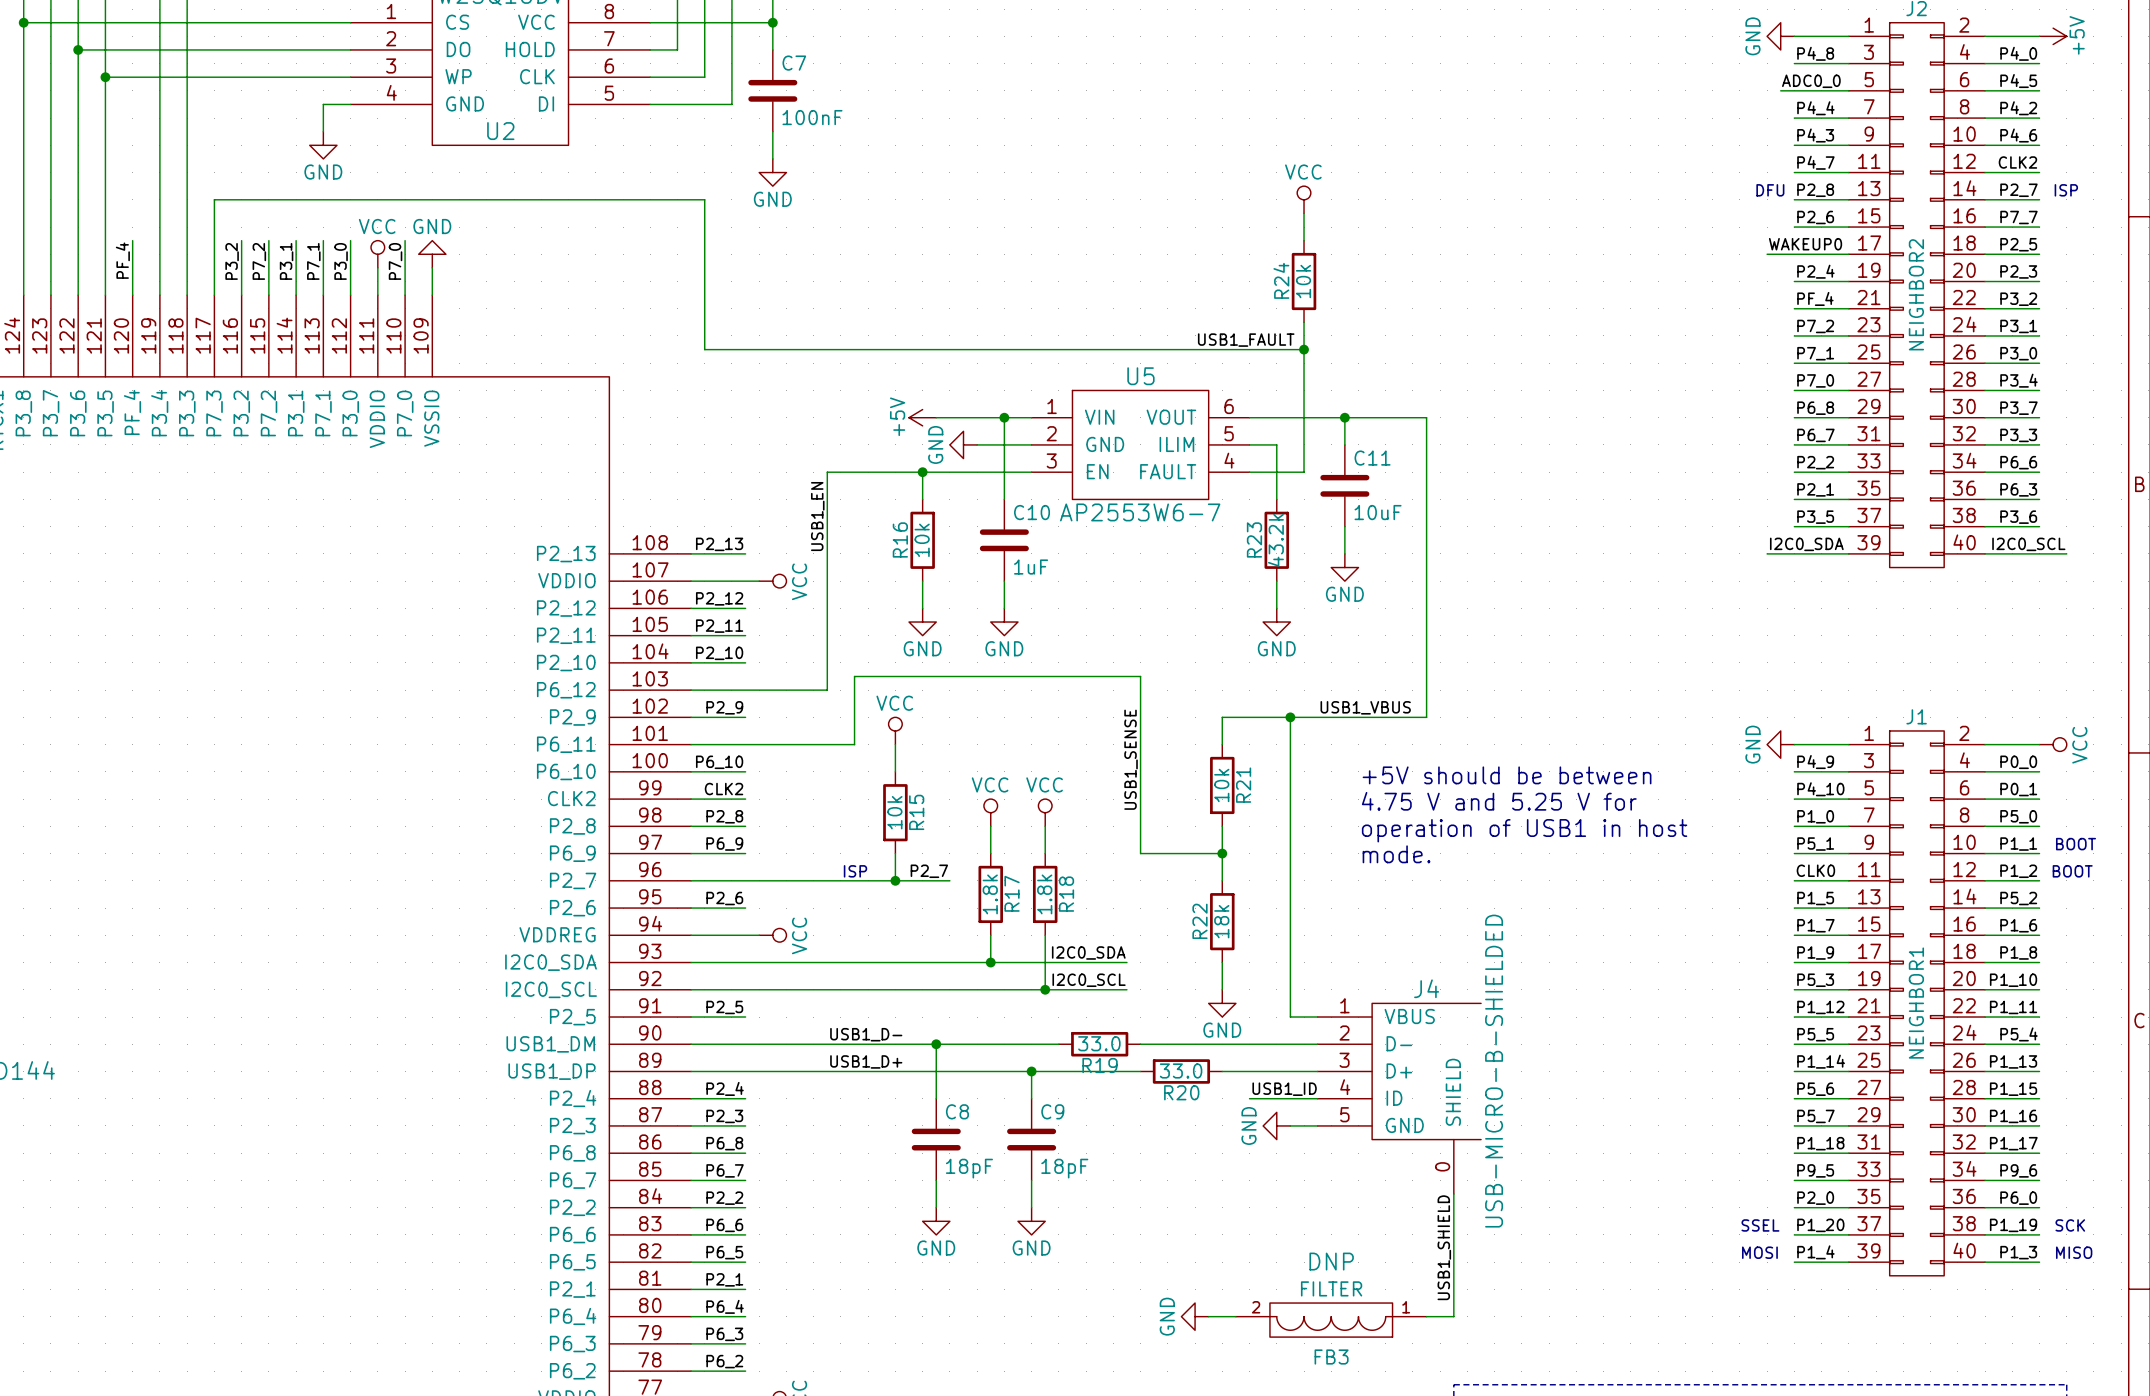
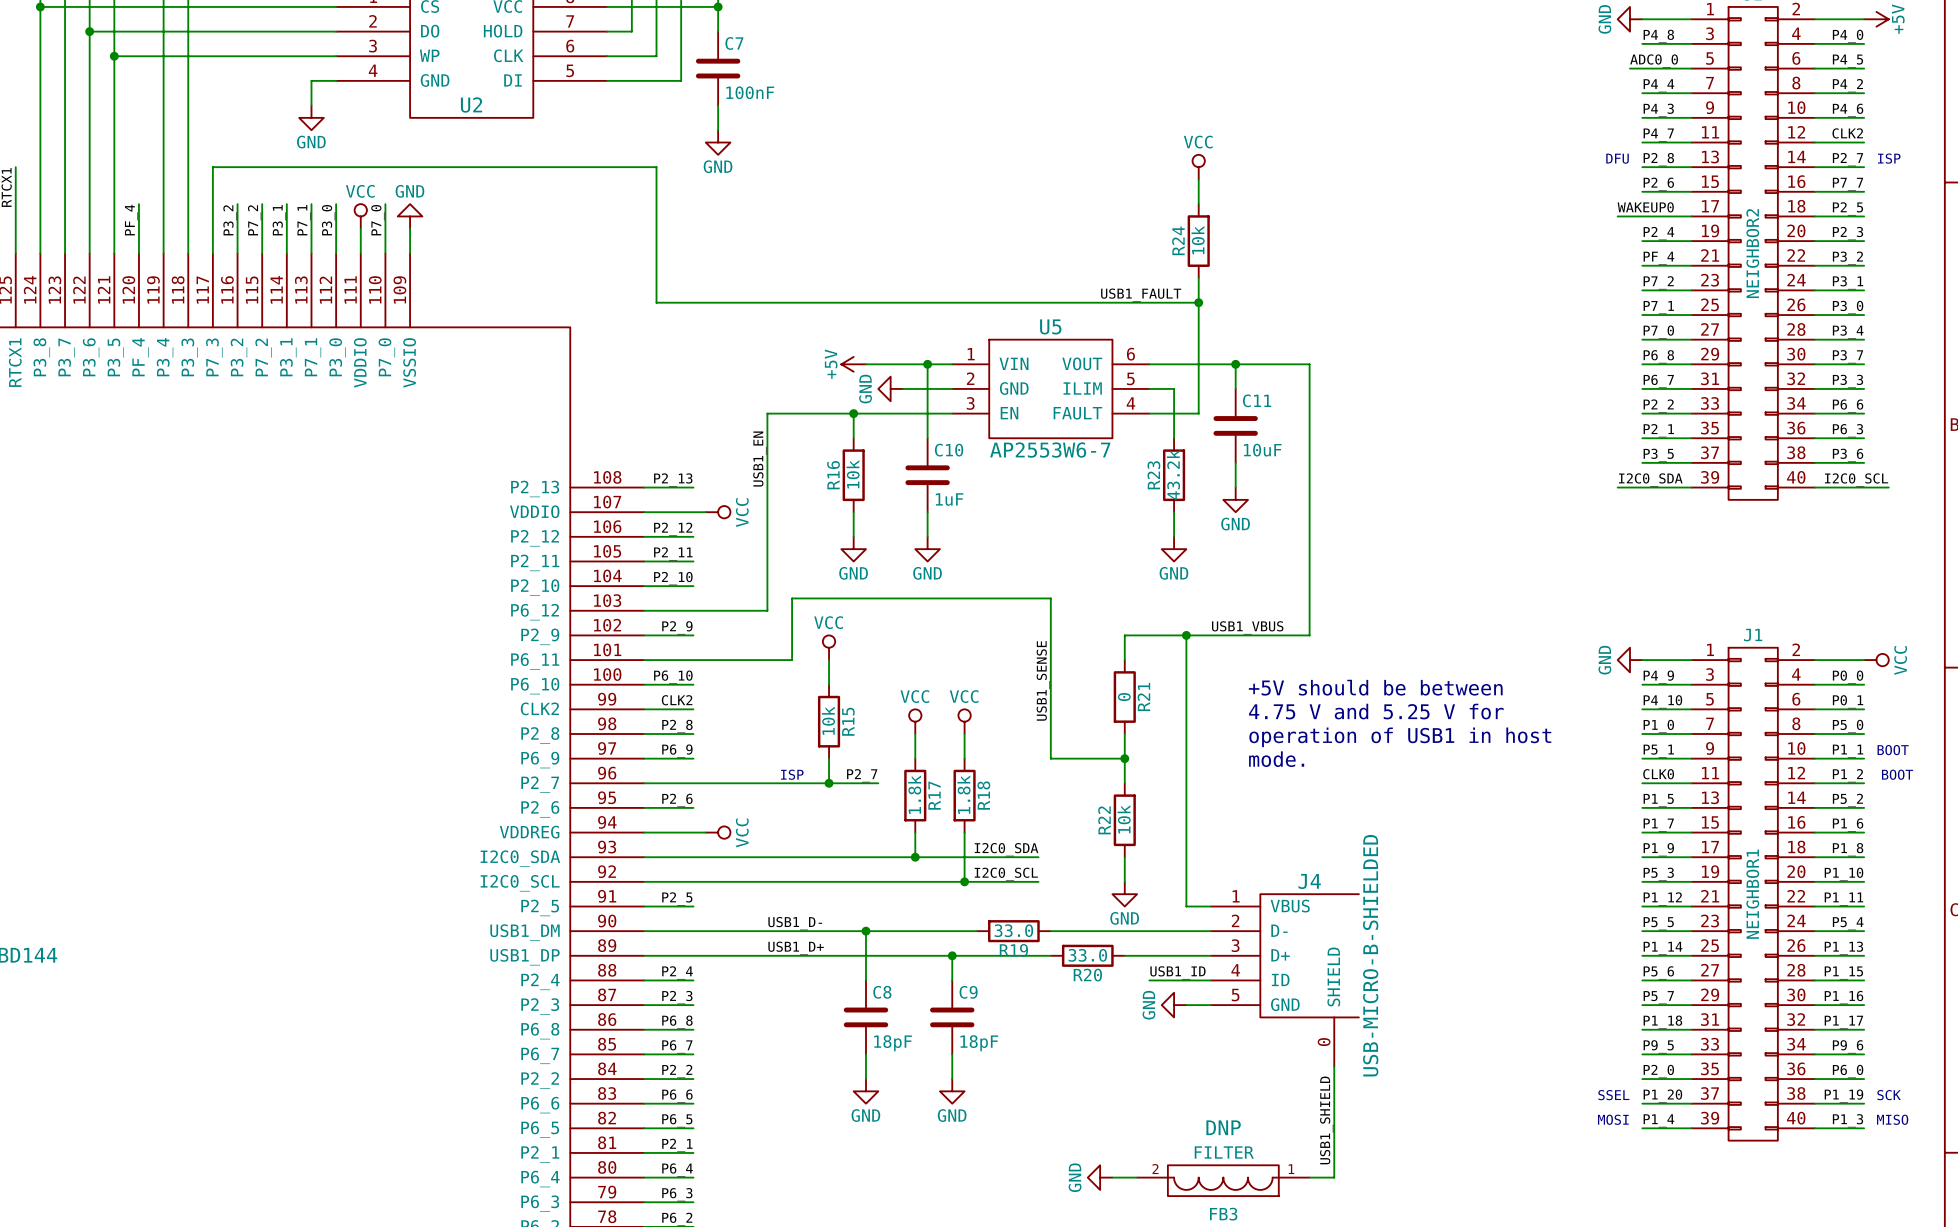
R21 value: 10k (1221, 785) -> 0 (1124, 697)
R22 value: 18k (1221, 921) -> 10k (1124, 819)

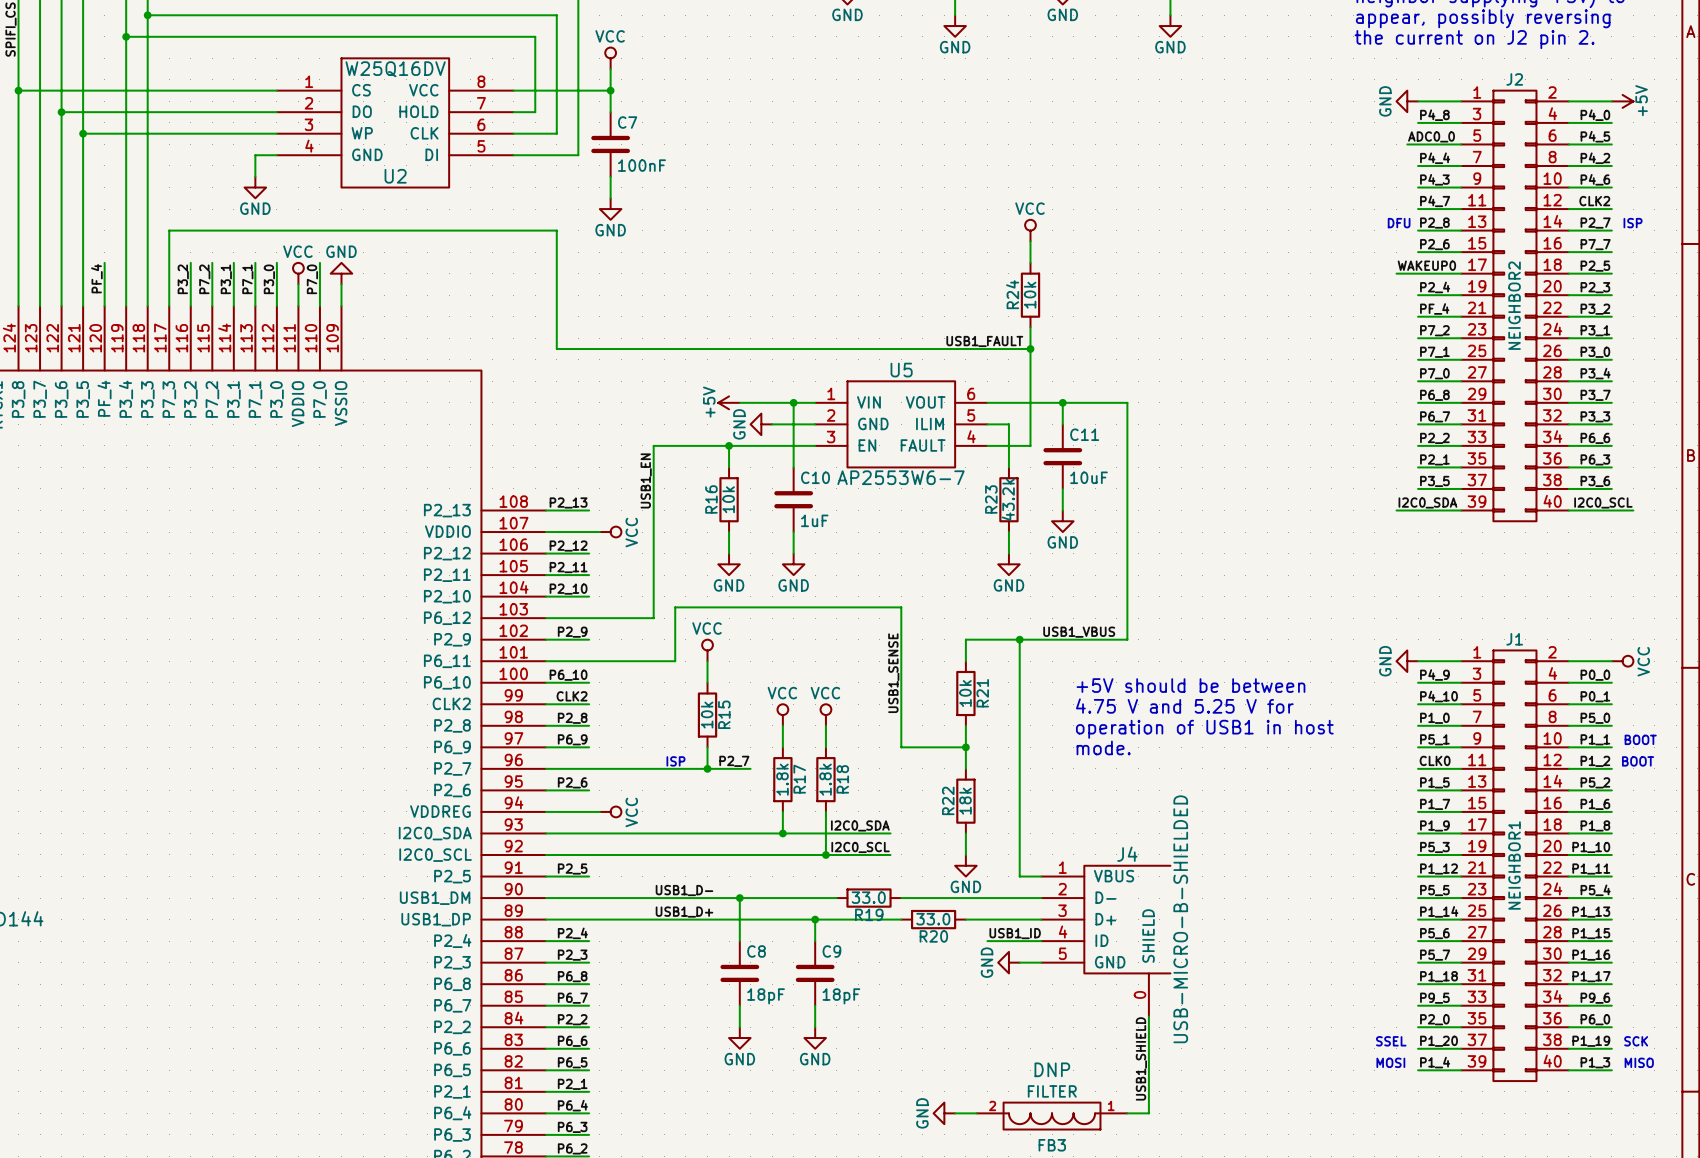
R21 value: 0 (1124, 697) -> 10k (965, 693)
R22 value: 10k (1124, 819) -> 18k (965, 801)

